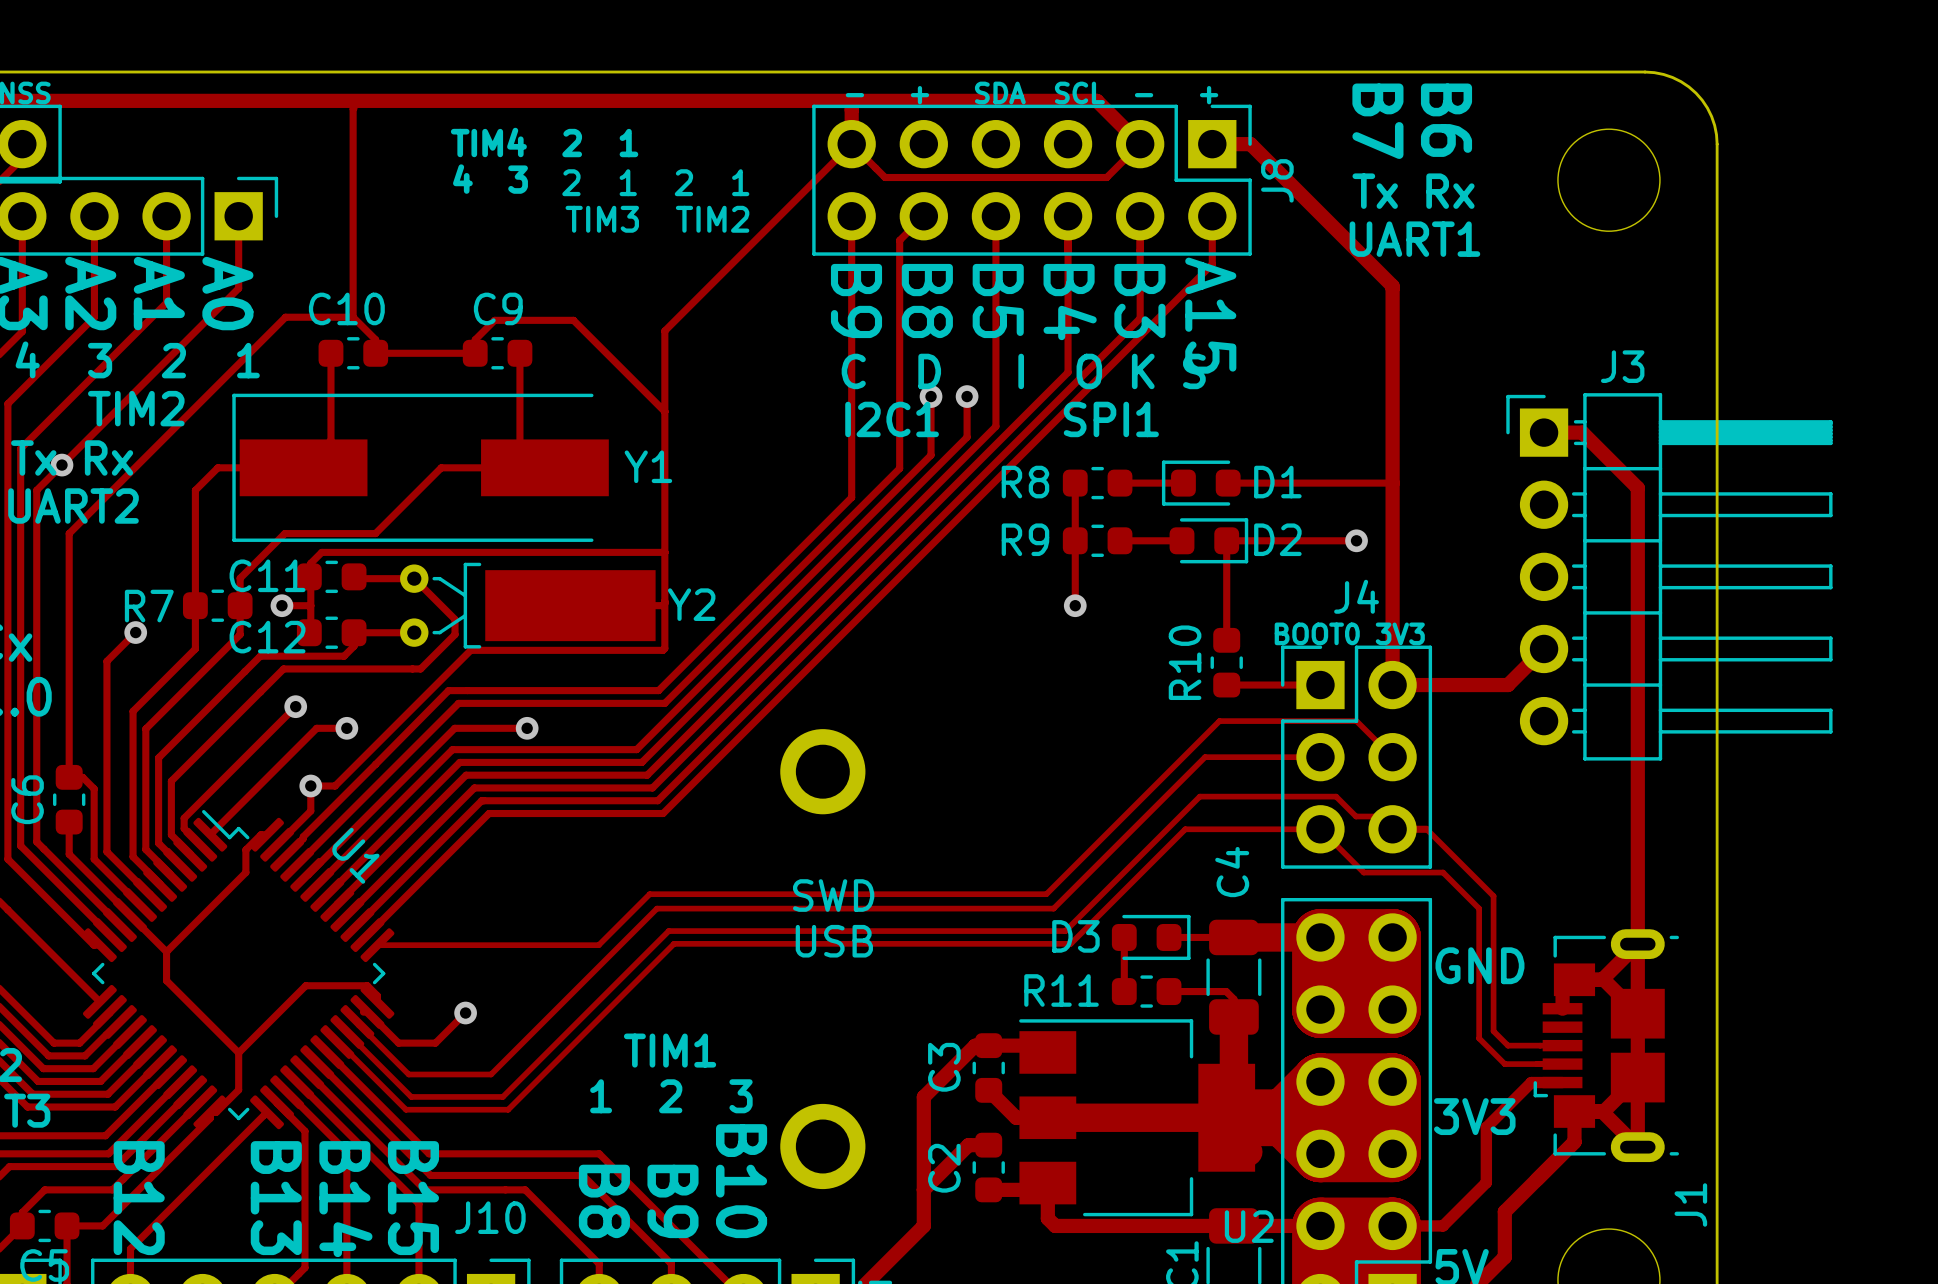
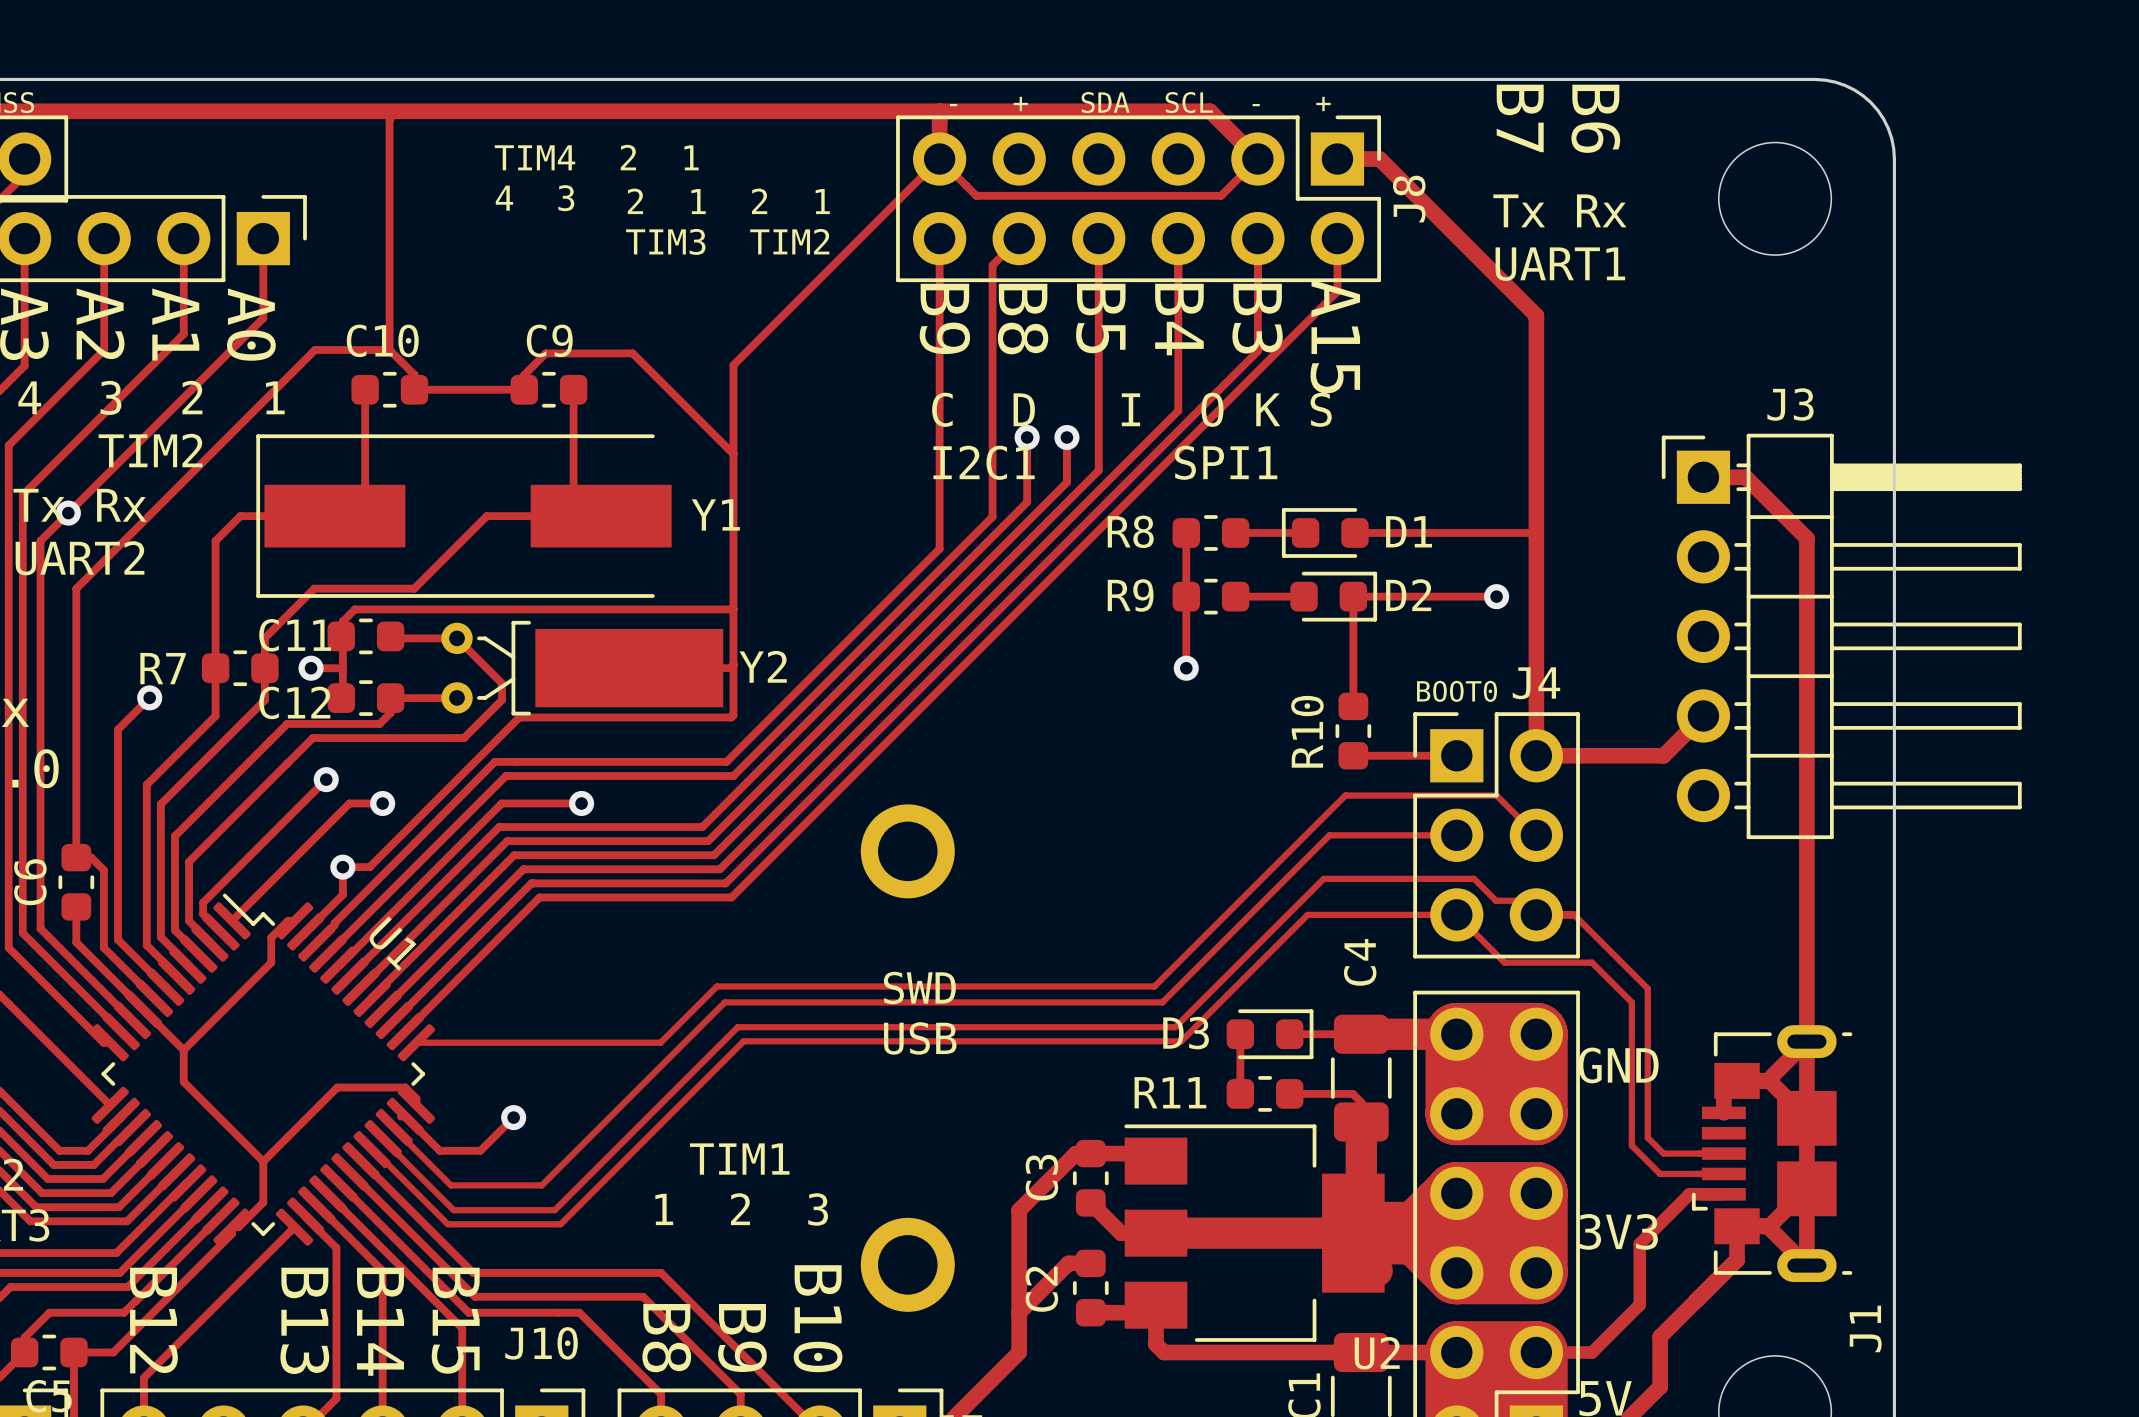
J4 name position: J4 (1356, 596) -> J4 (1536, 683)
text: BOOT0 3V3 (1349, 633) -> BOOT0 (1457, 691)

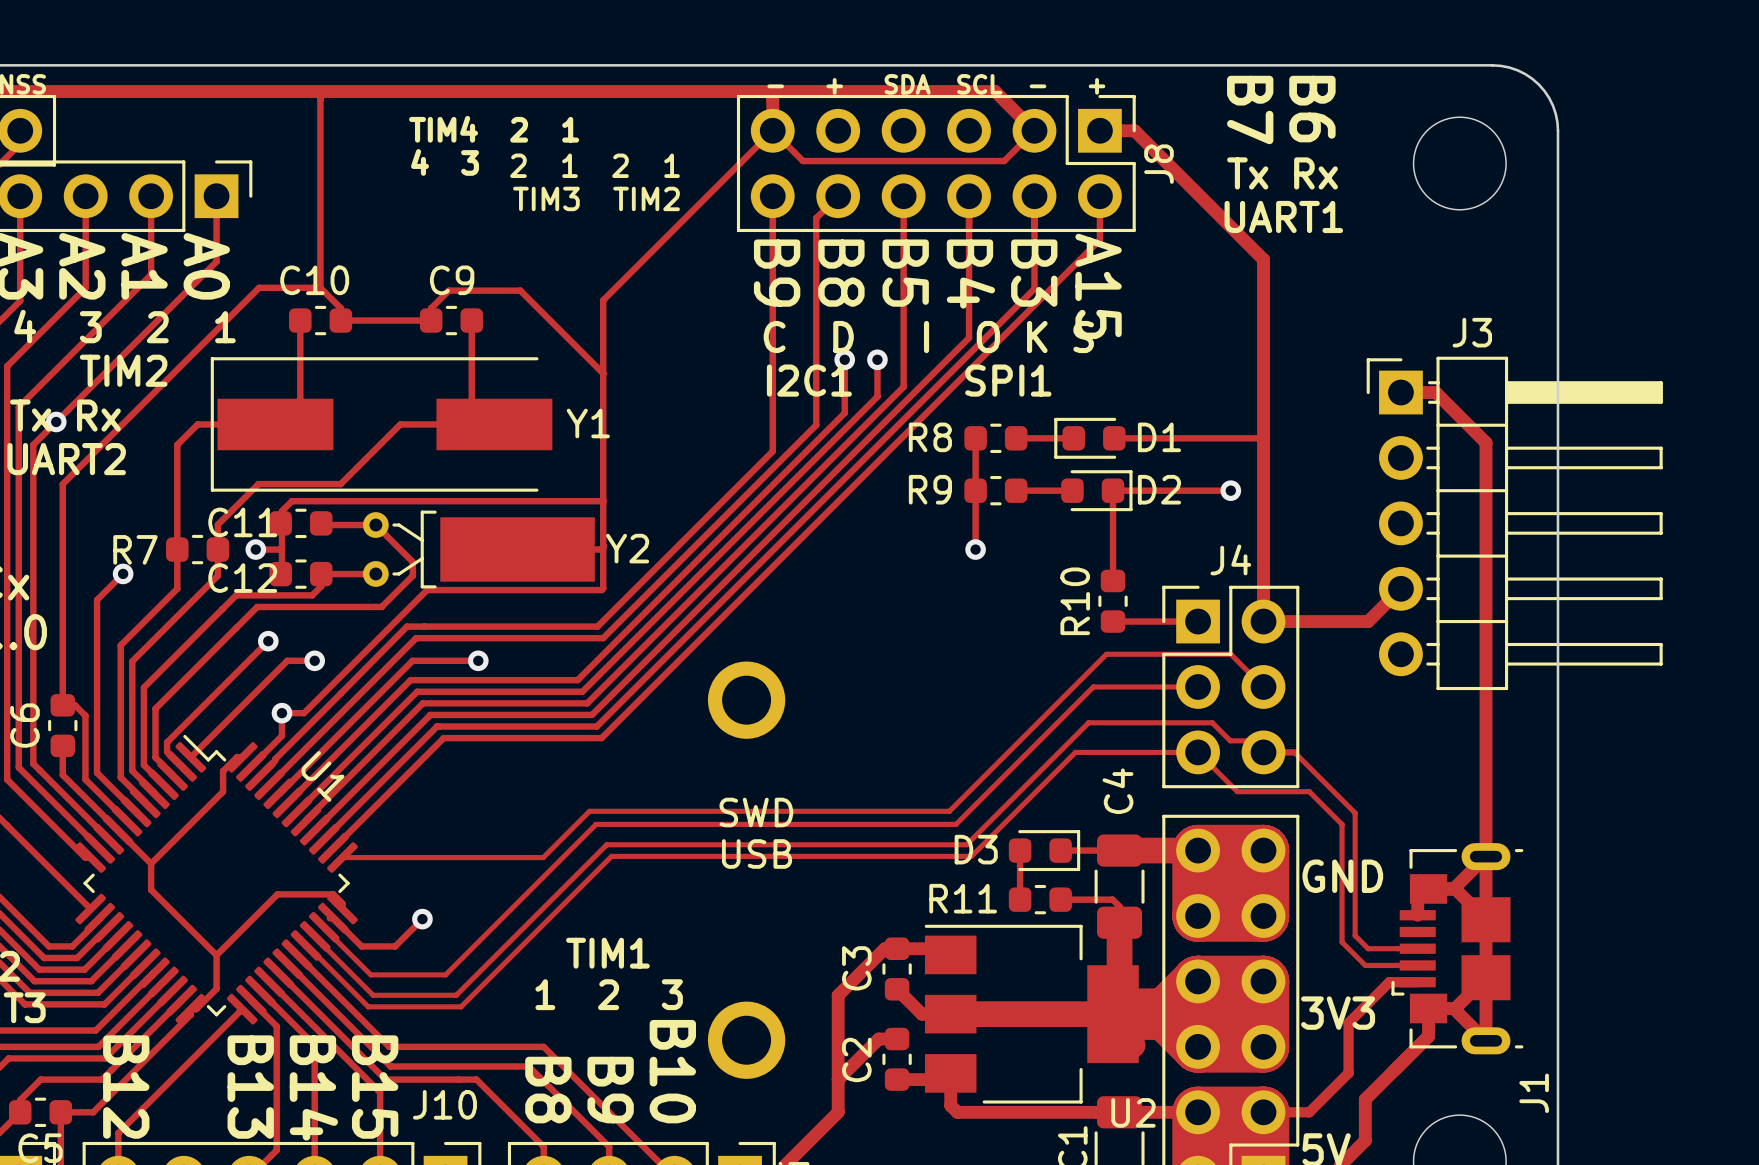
J4 name position: J4 (1536, 683) -> J4 (1230, 559)
text: BOOT0 (1457, 691) -> none

